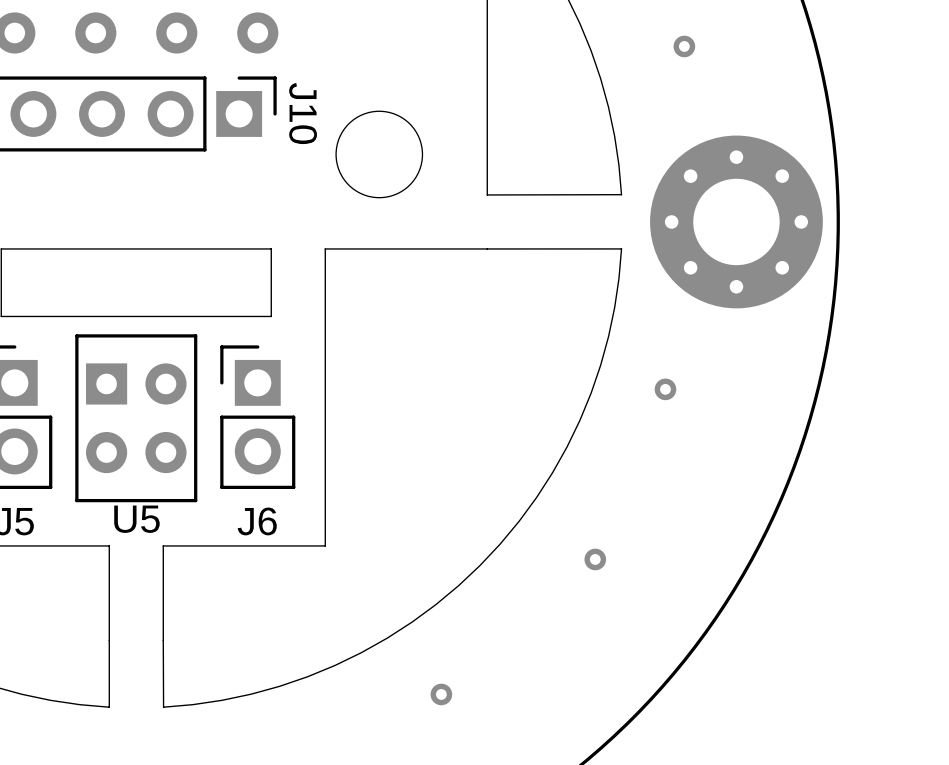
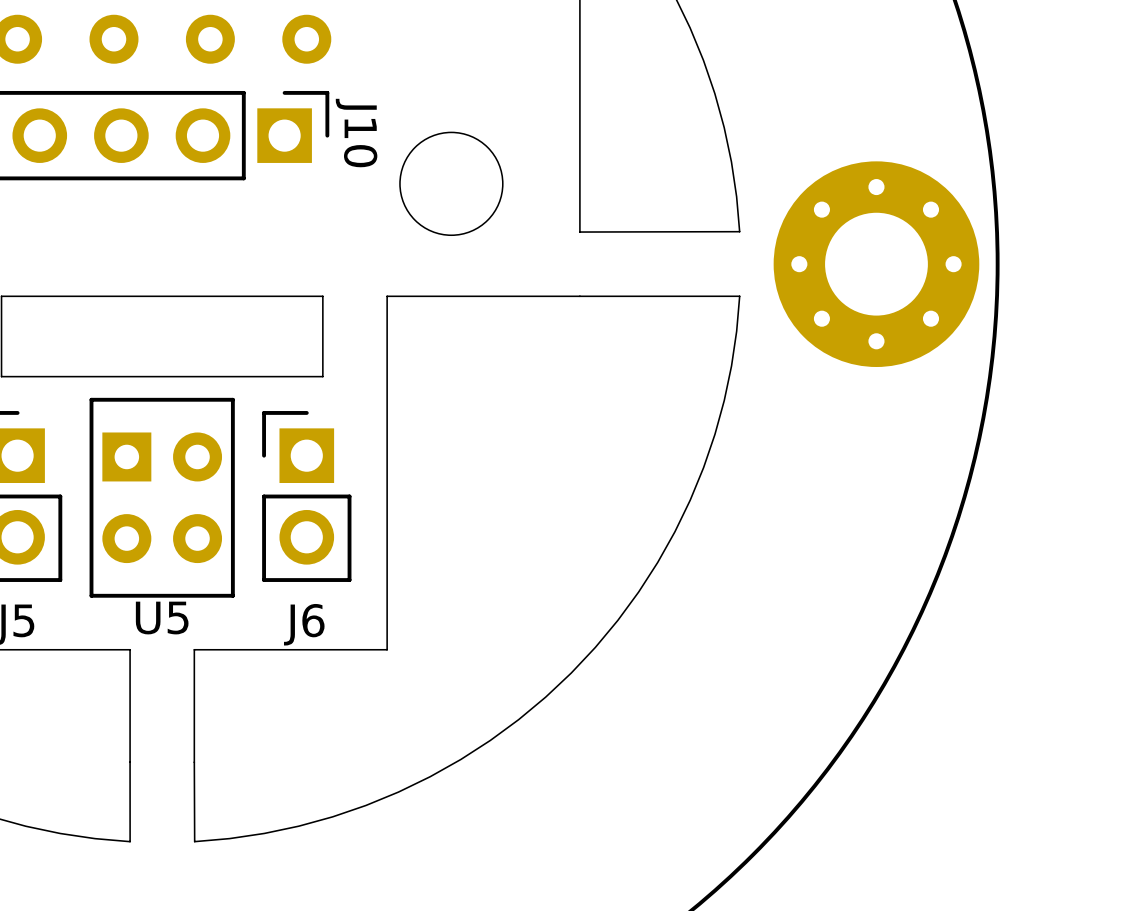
via: (684, 46) -> none
via: (665, 389) -> none
via: (595, 559) -> none
via: (441, 694) -> none

